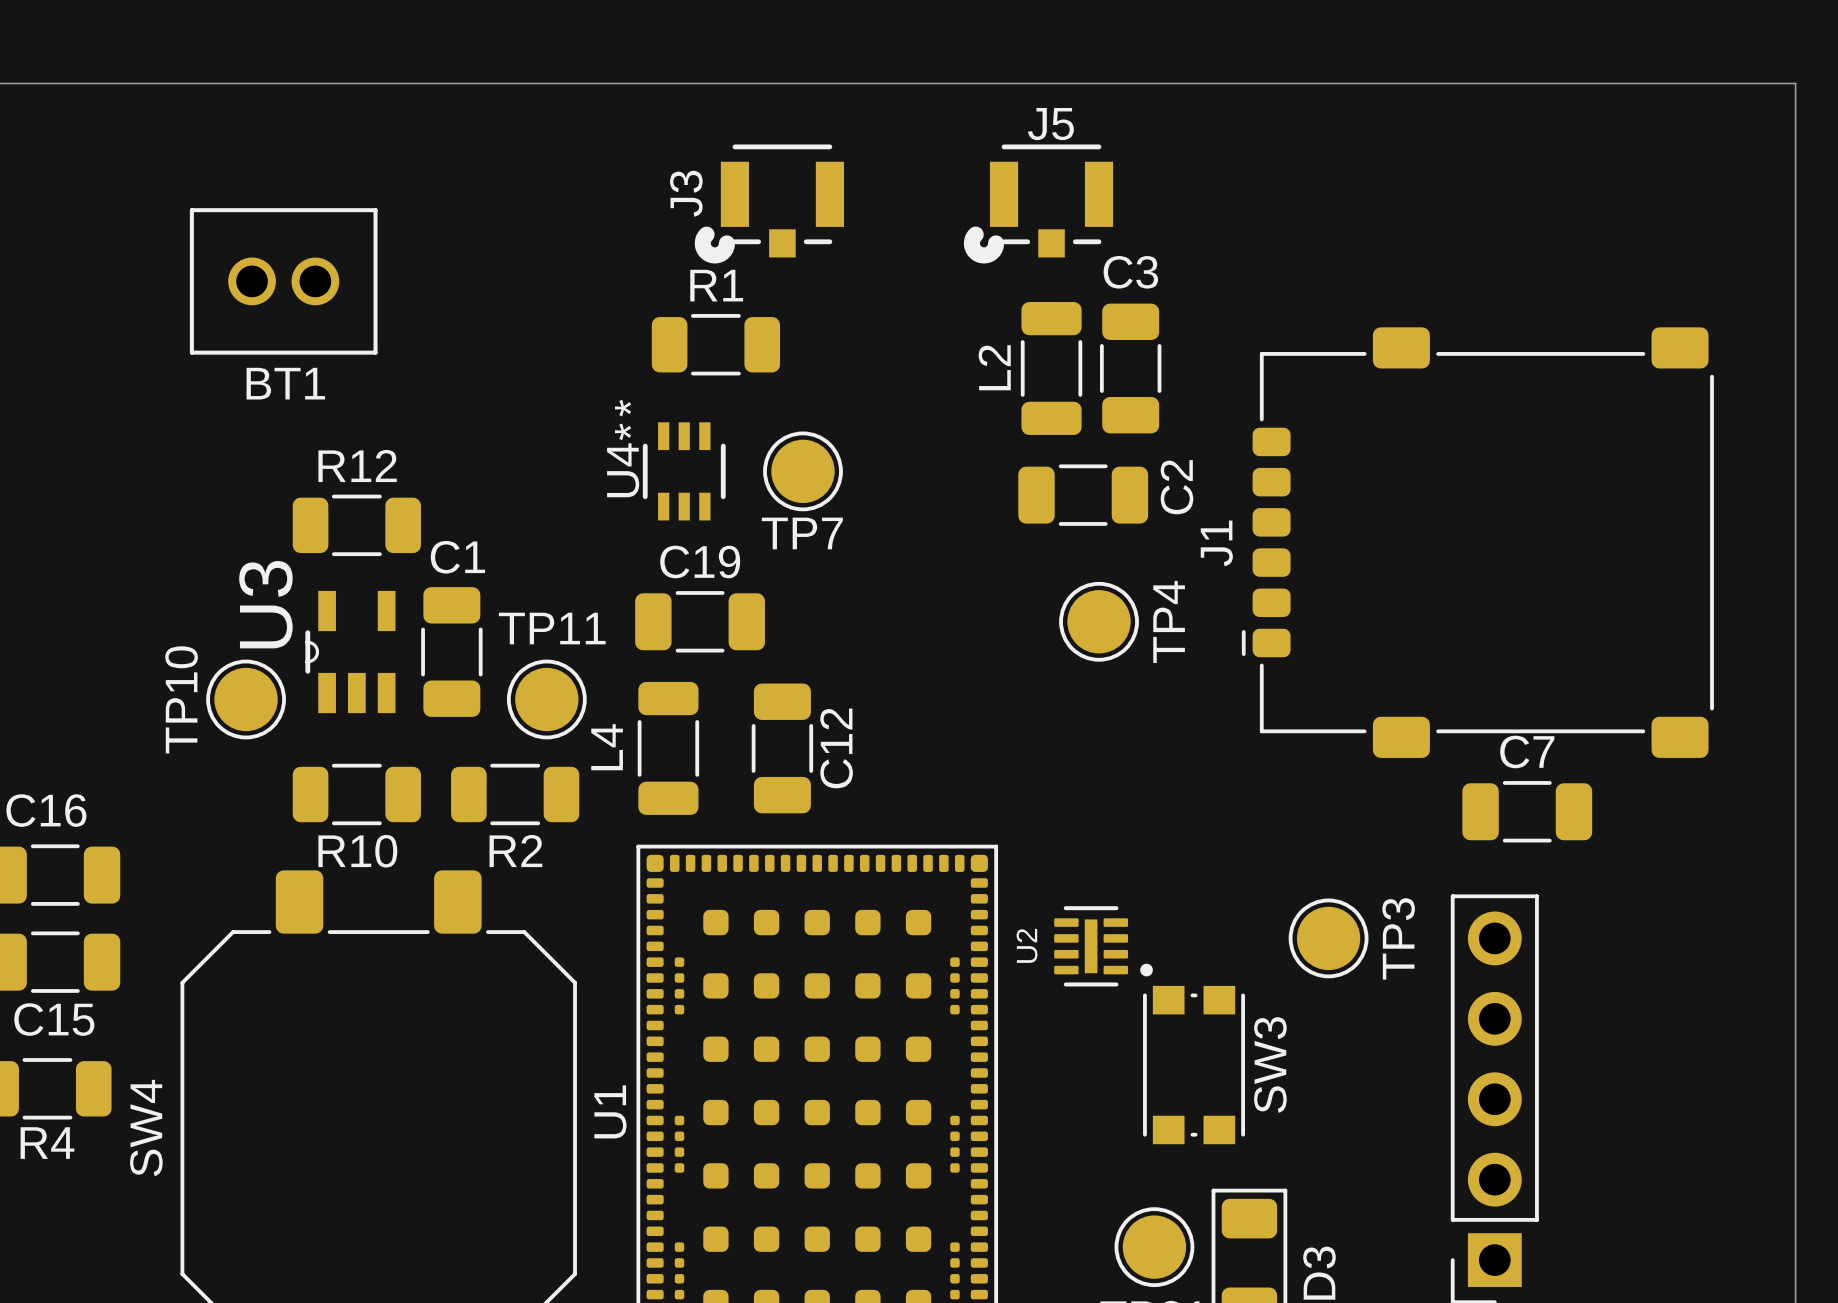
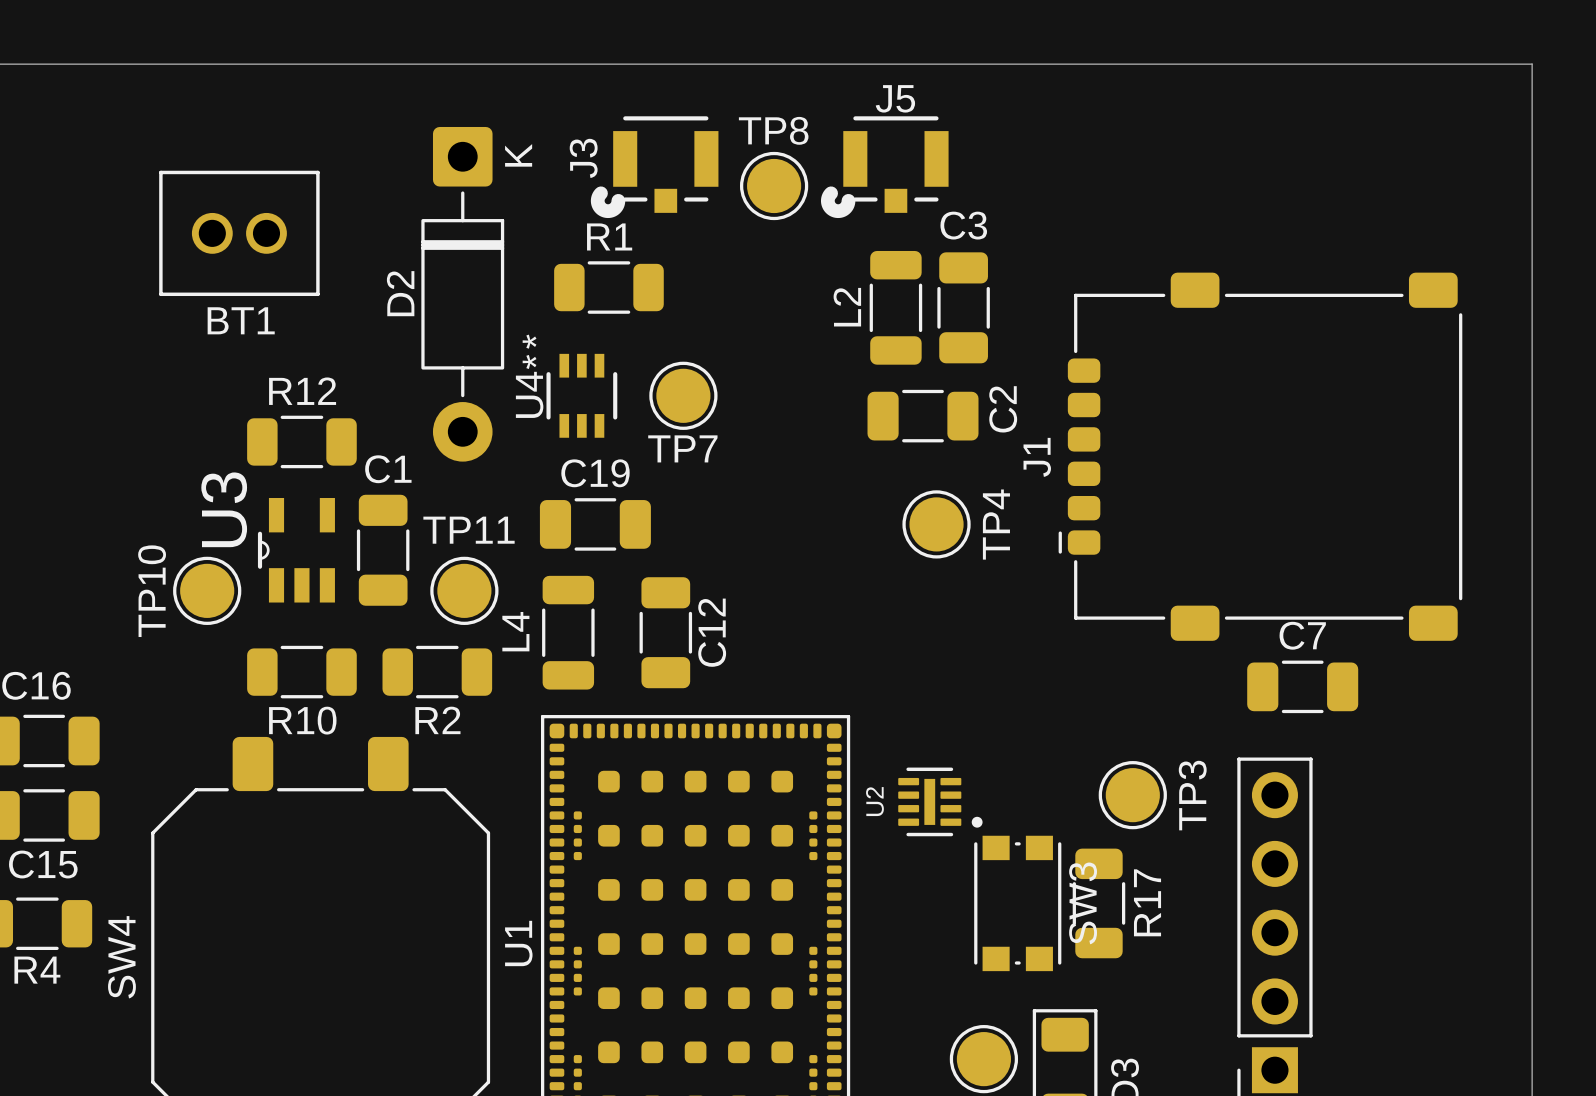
TP8: none -> (774, 186)
D2: none -> (462, 294)
R17: none -> (1098, 903)

